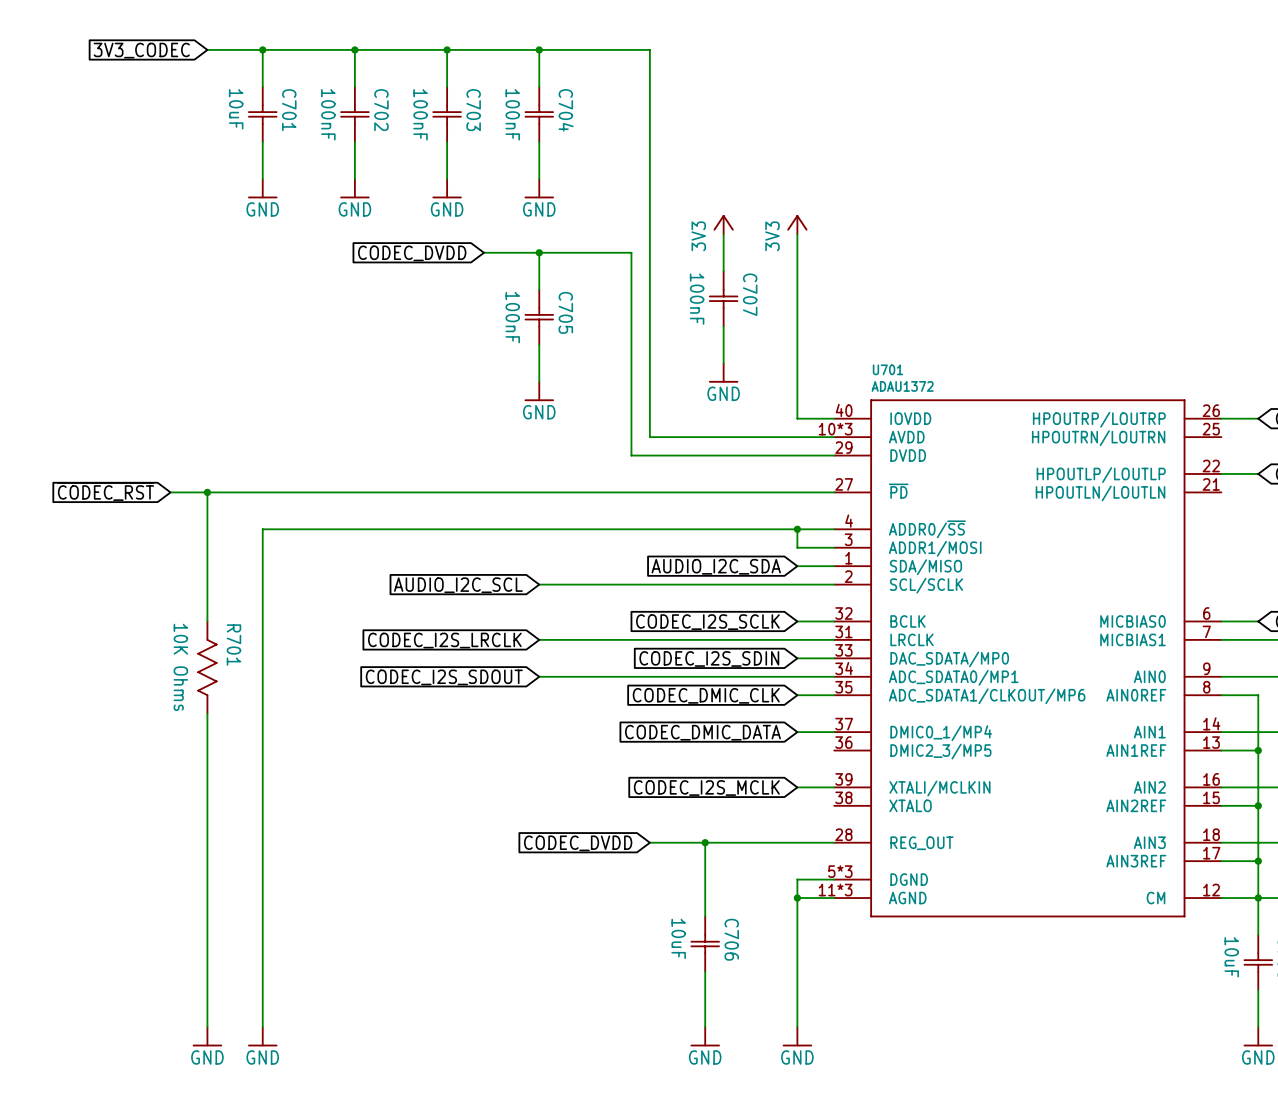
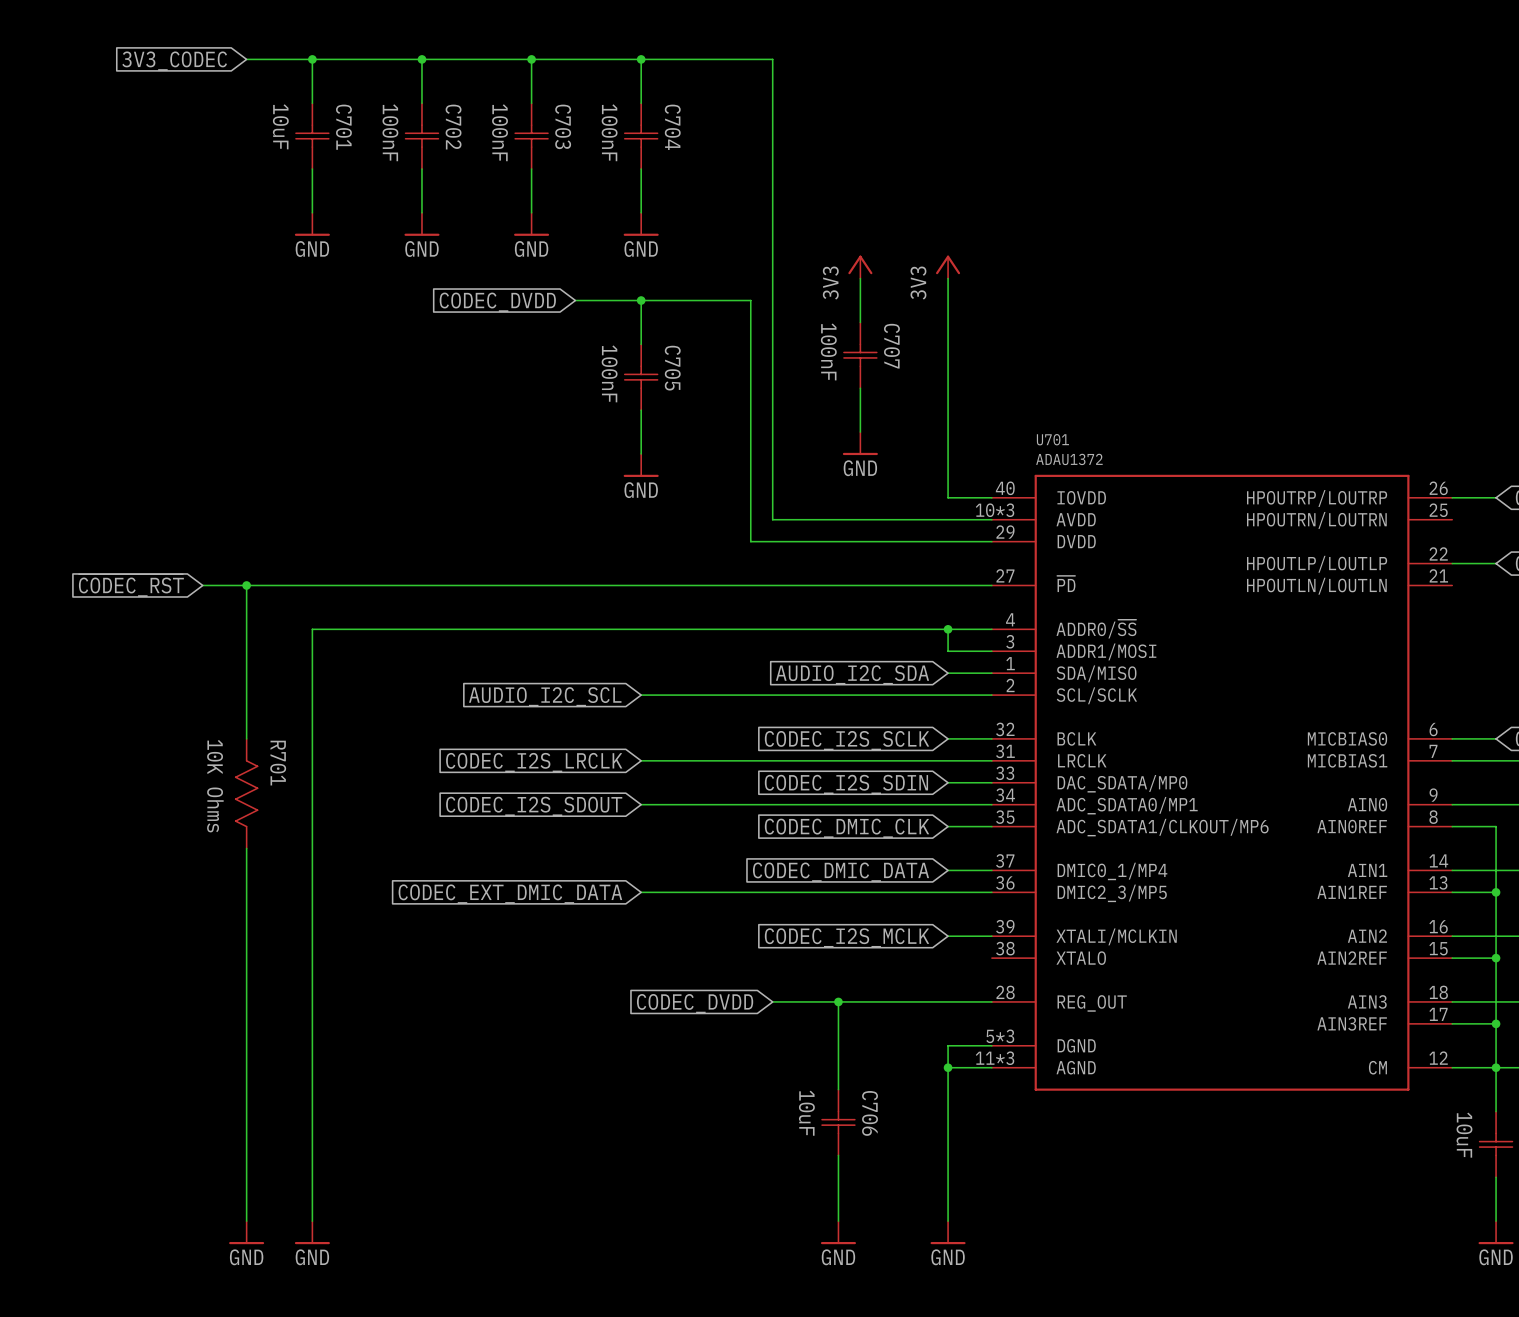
wire: none -> (641, 892) (991, 892)
global label: none -> CODEC_EXT_DMIC_DATA (510, 894)

